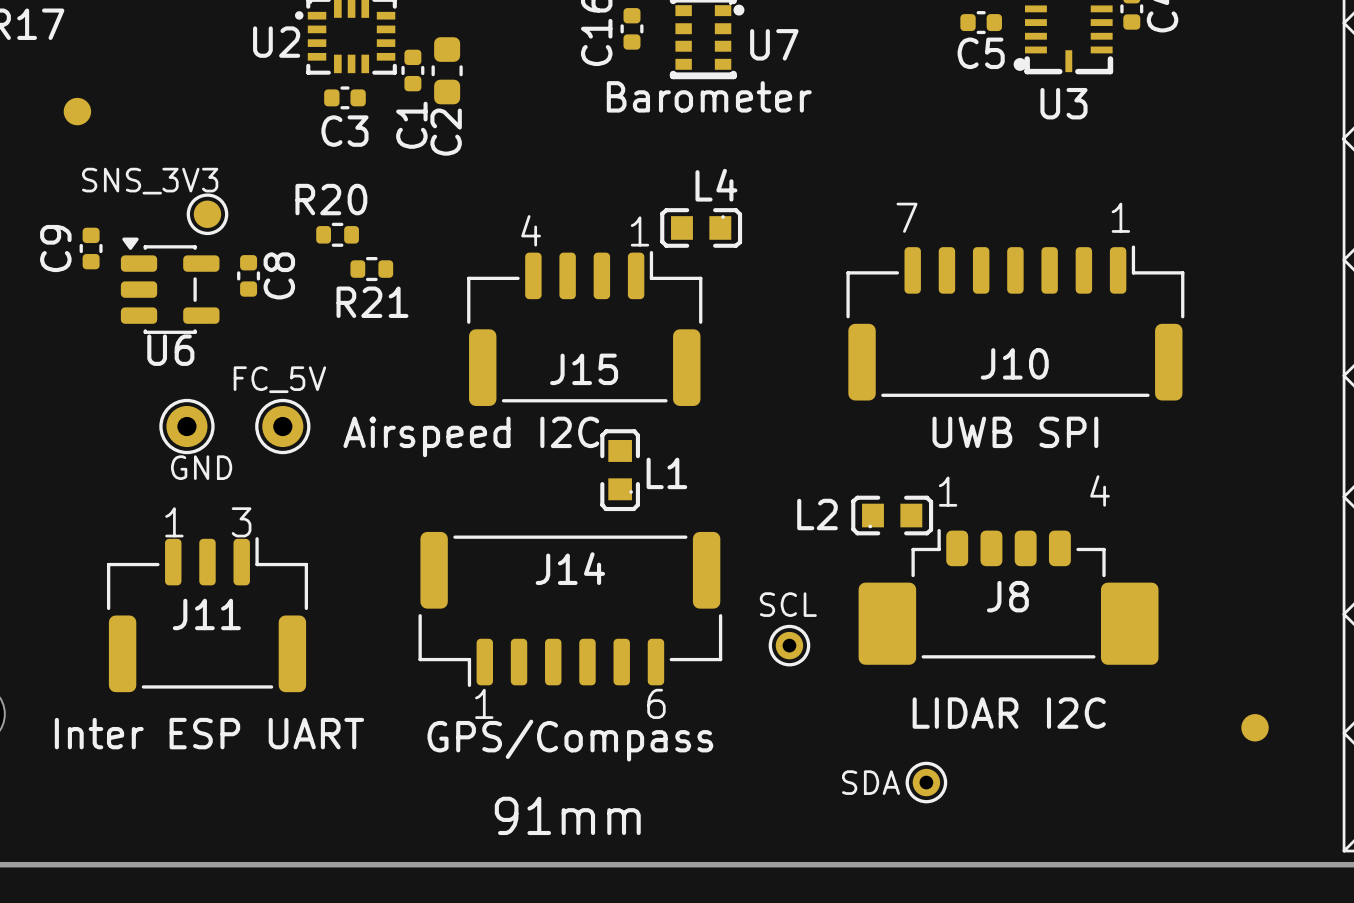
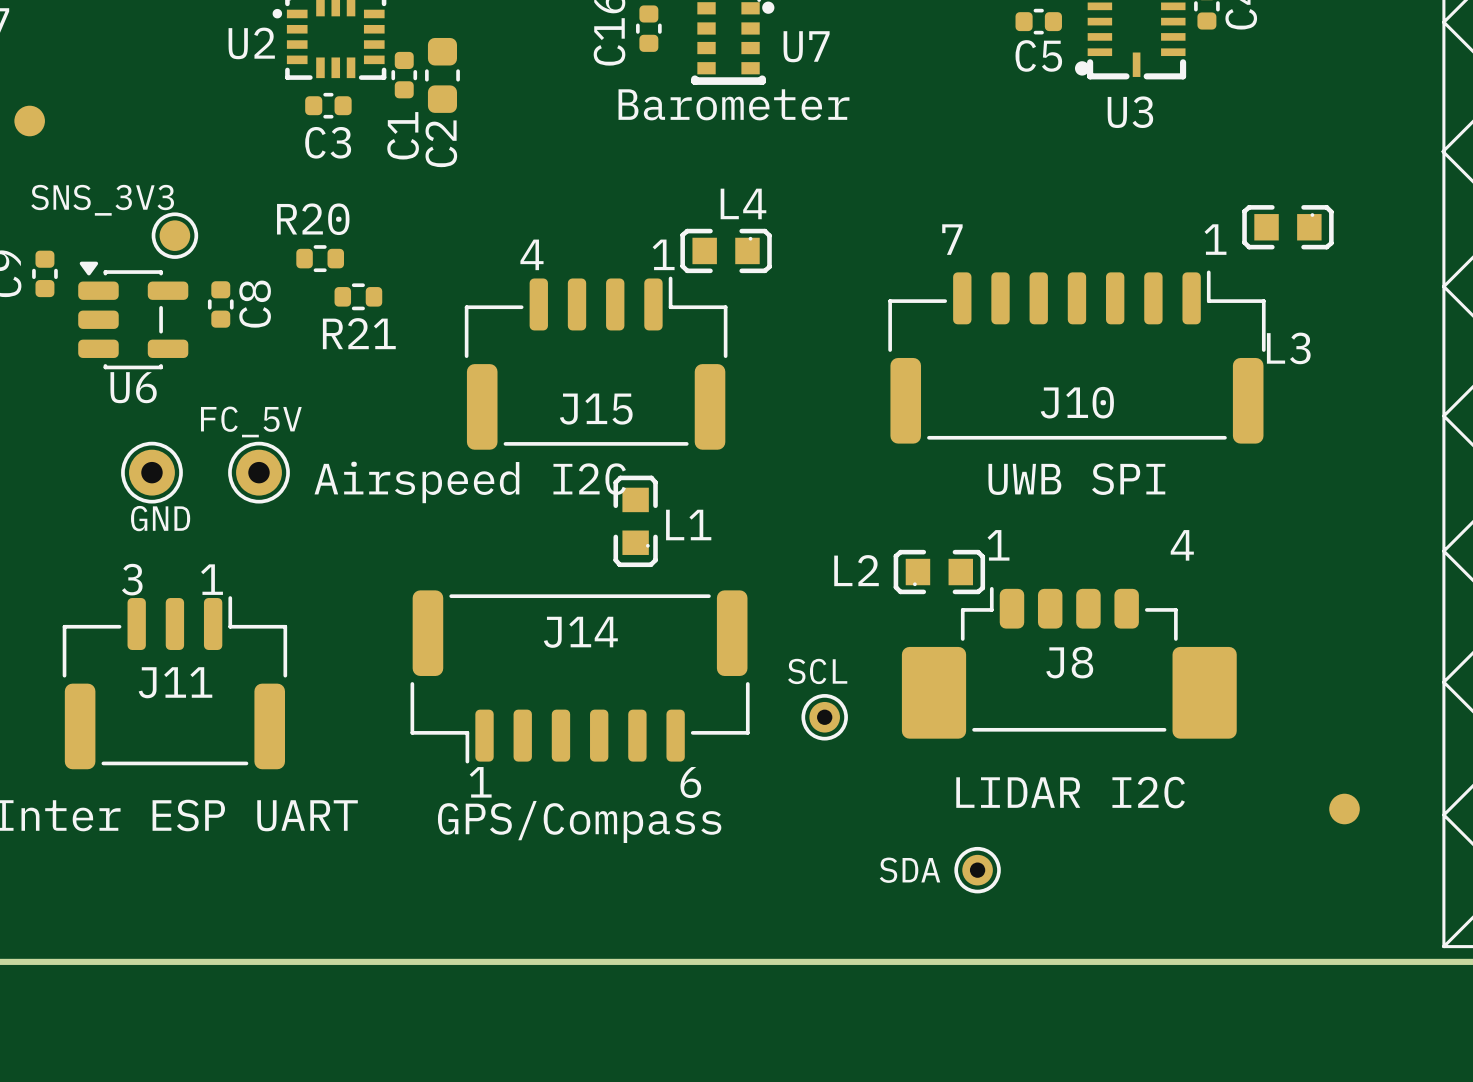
L3: none -> (1287, 227)
text: 1 3 (208, 522) -> 3 1 (172, 579)
text: 91mm (567, 815) -> none

